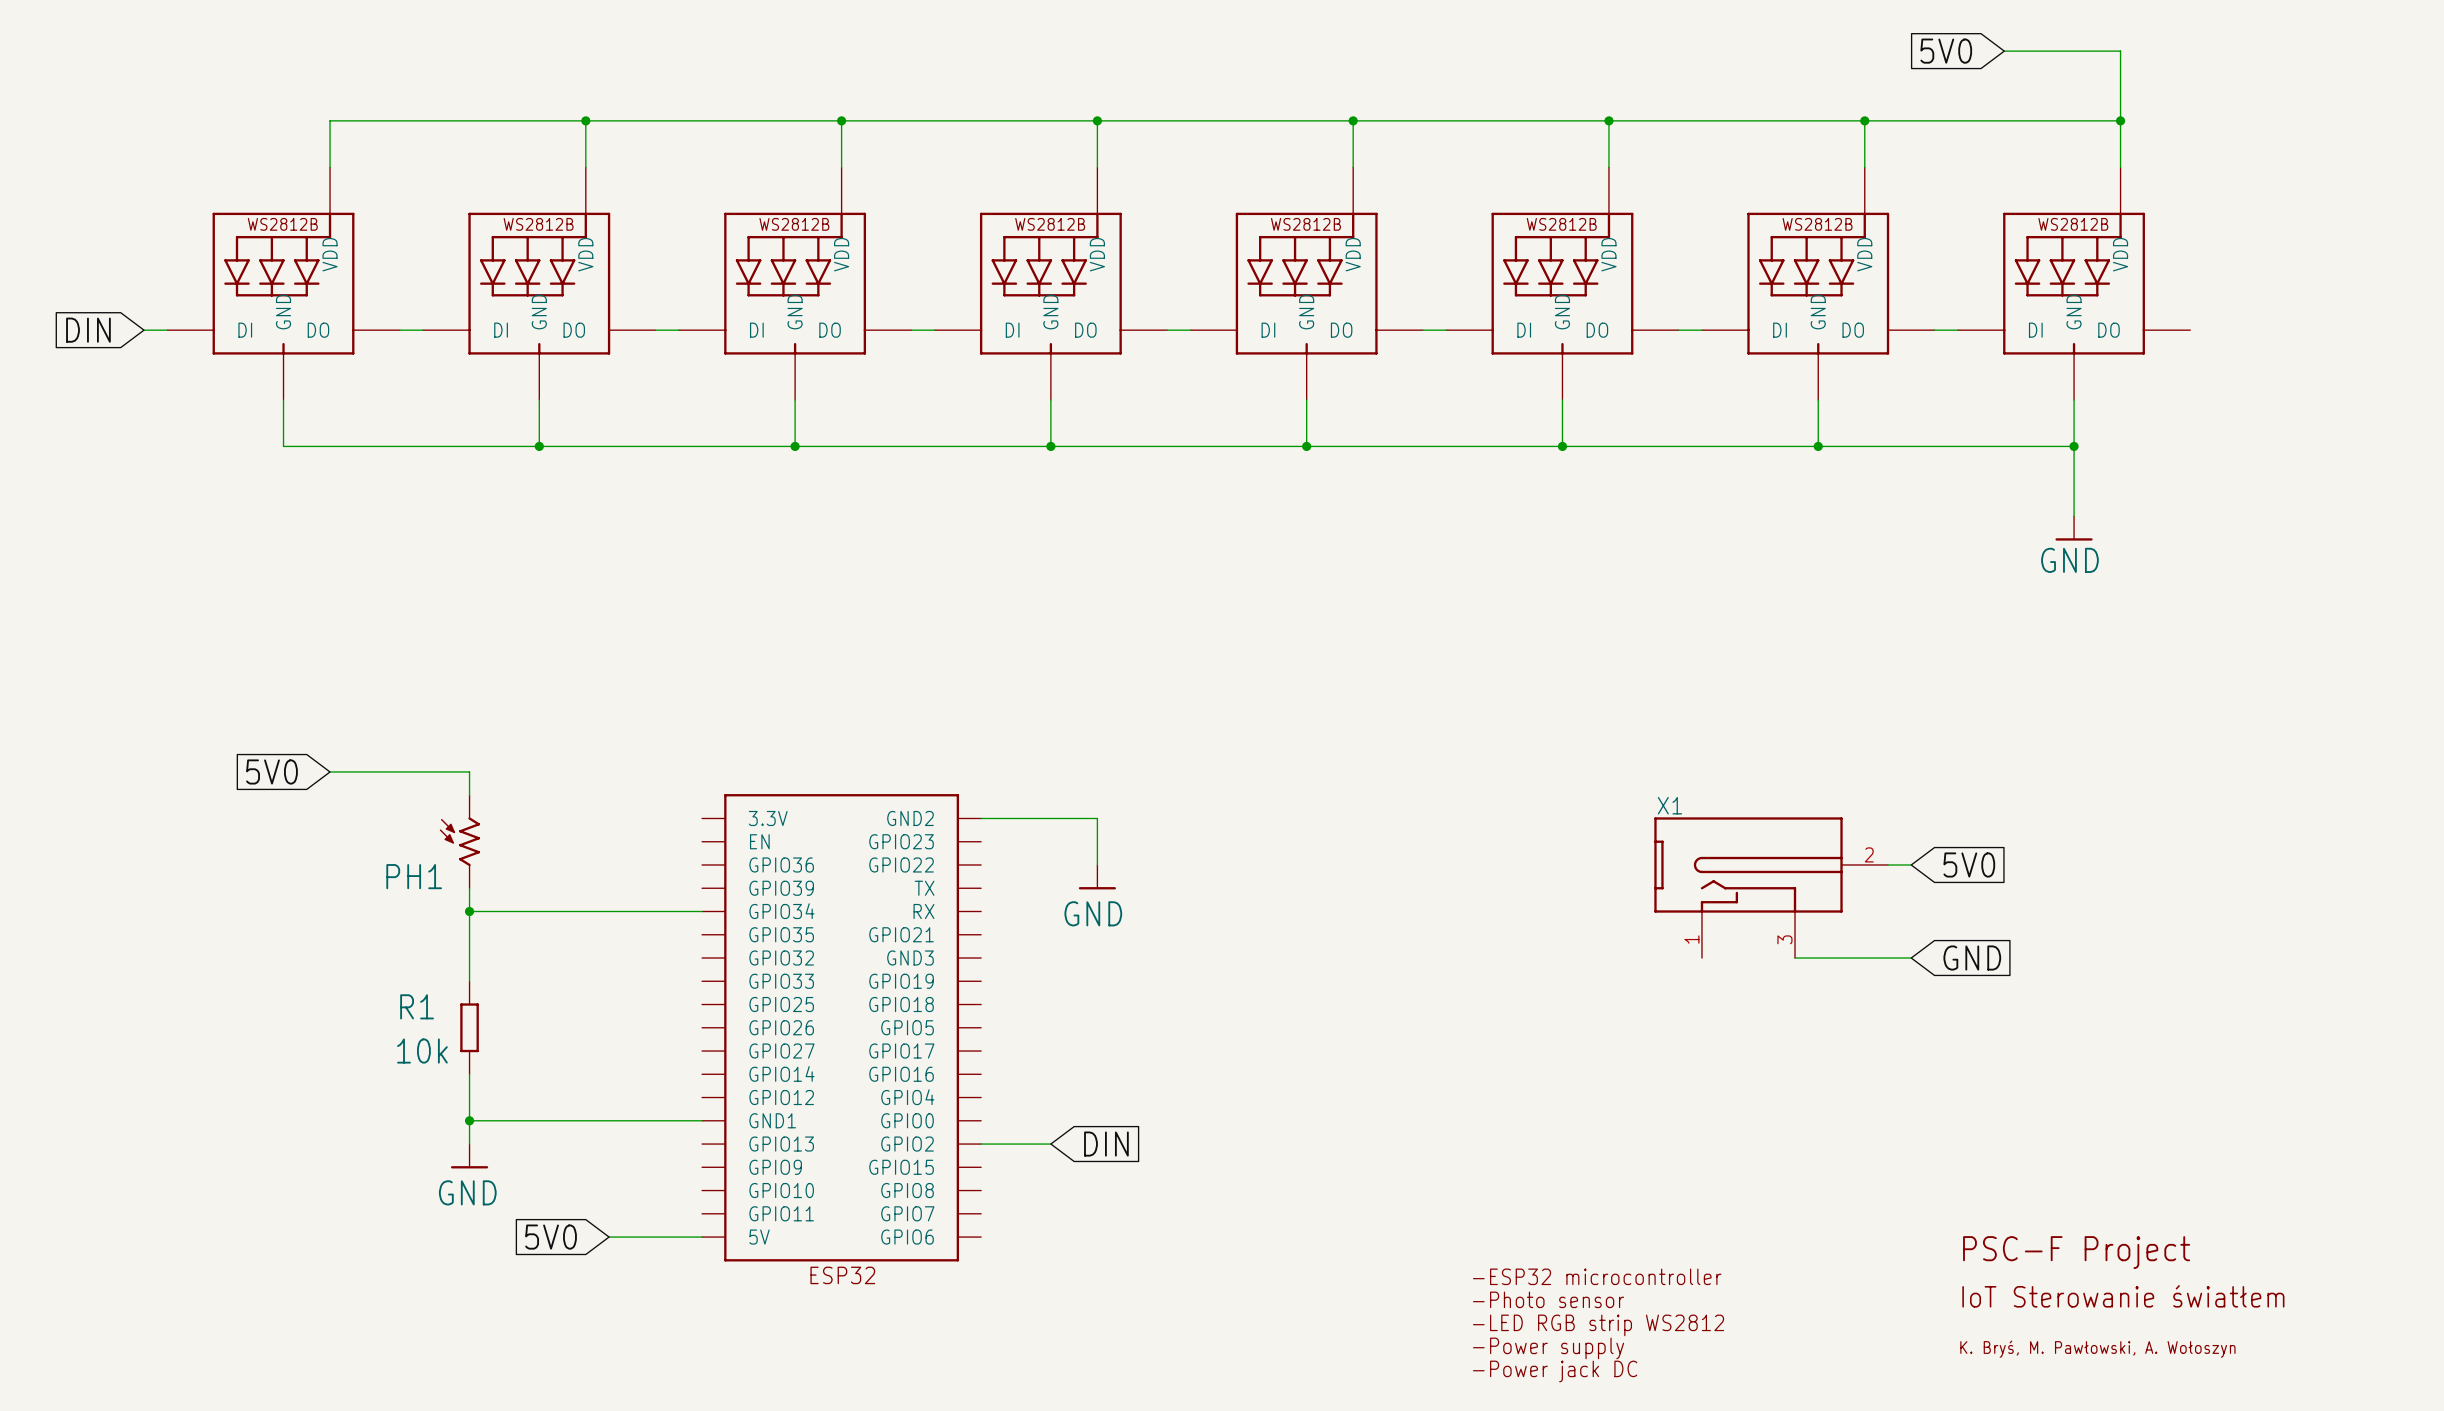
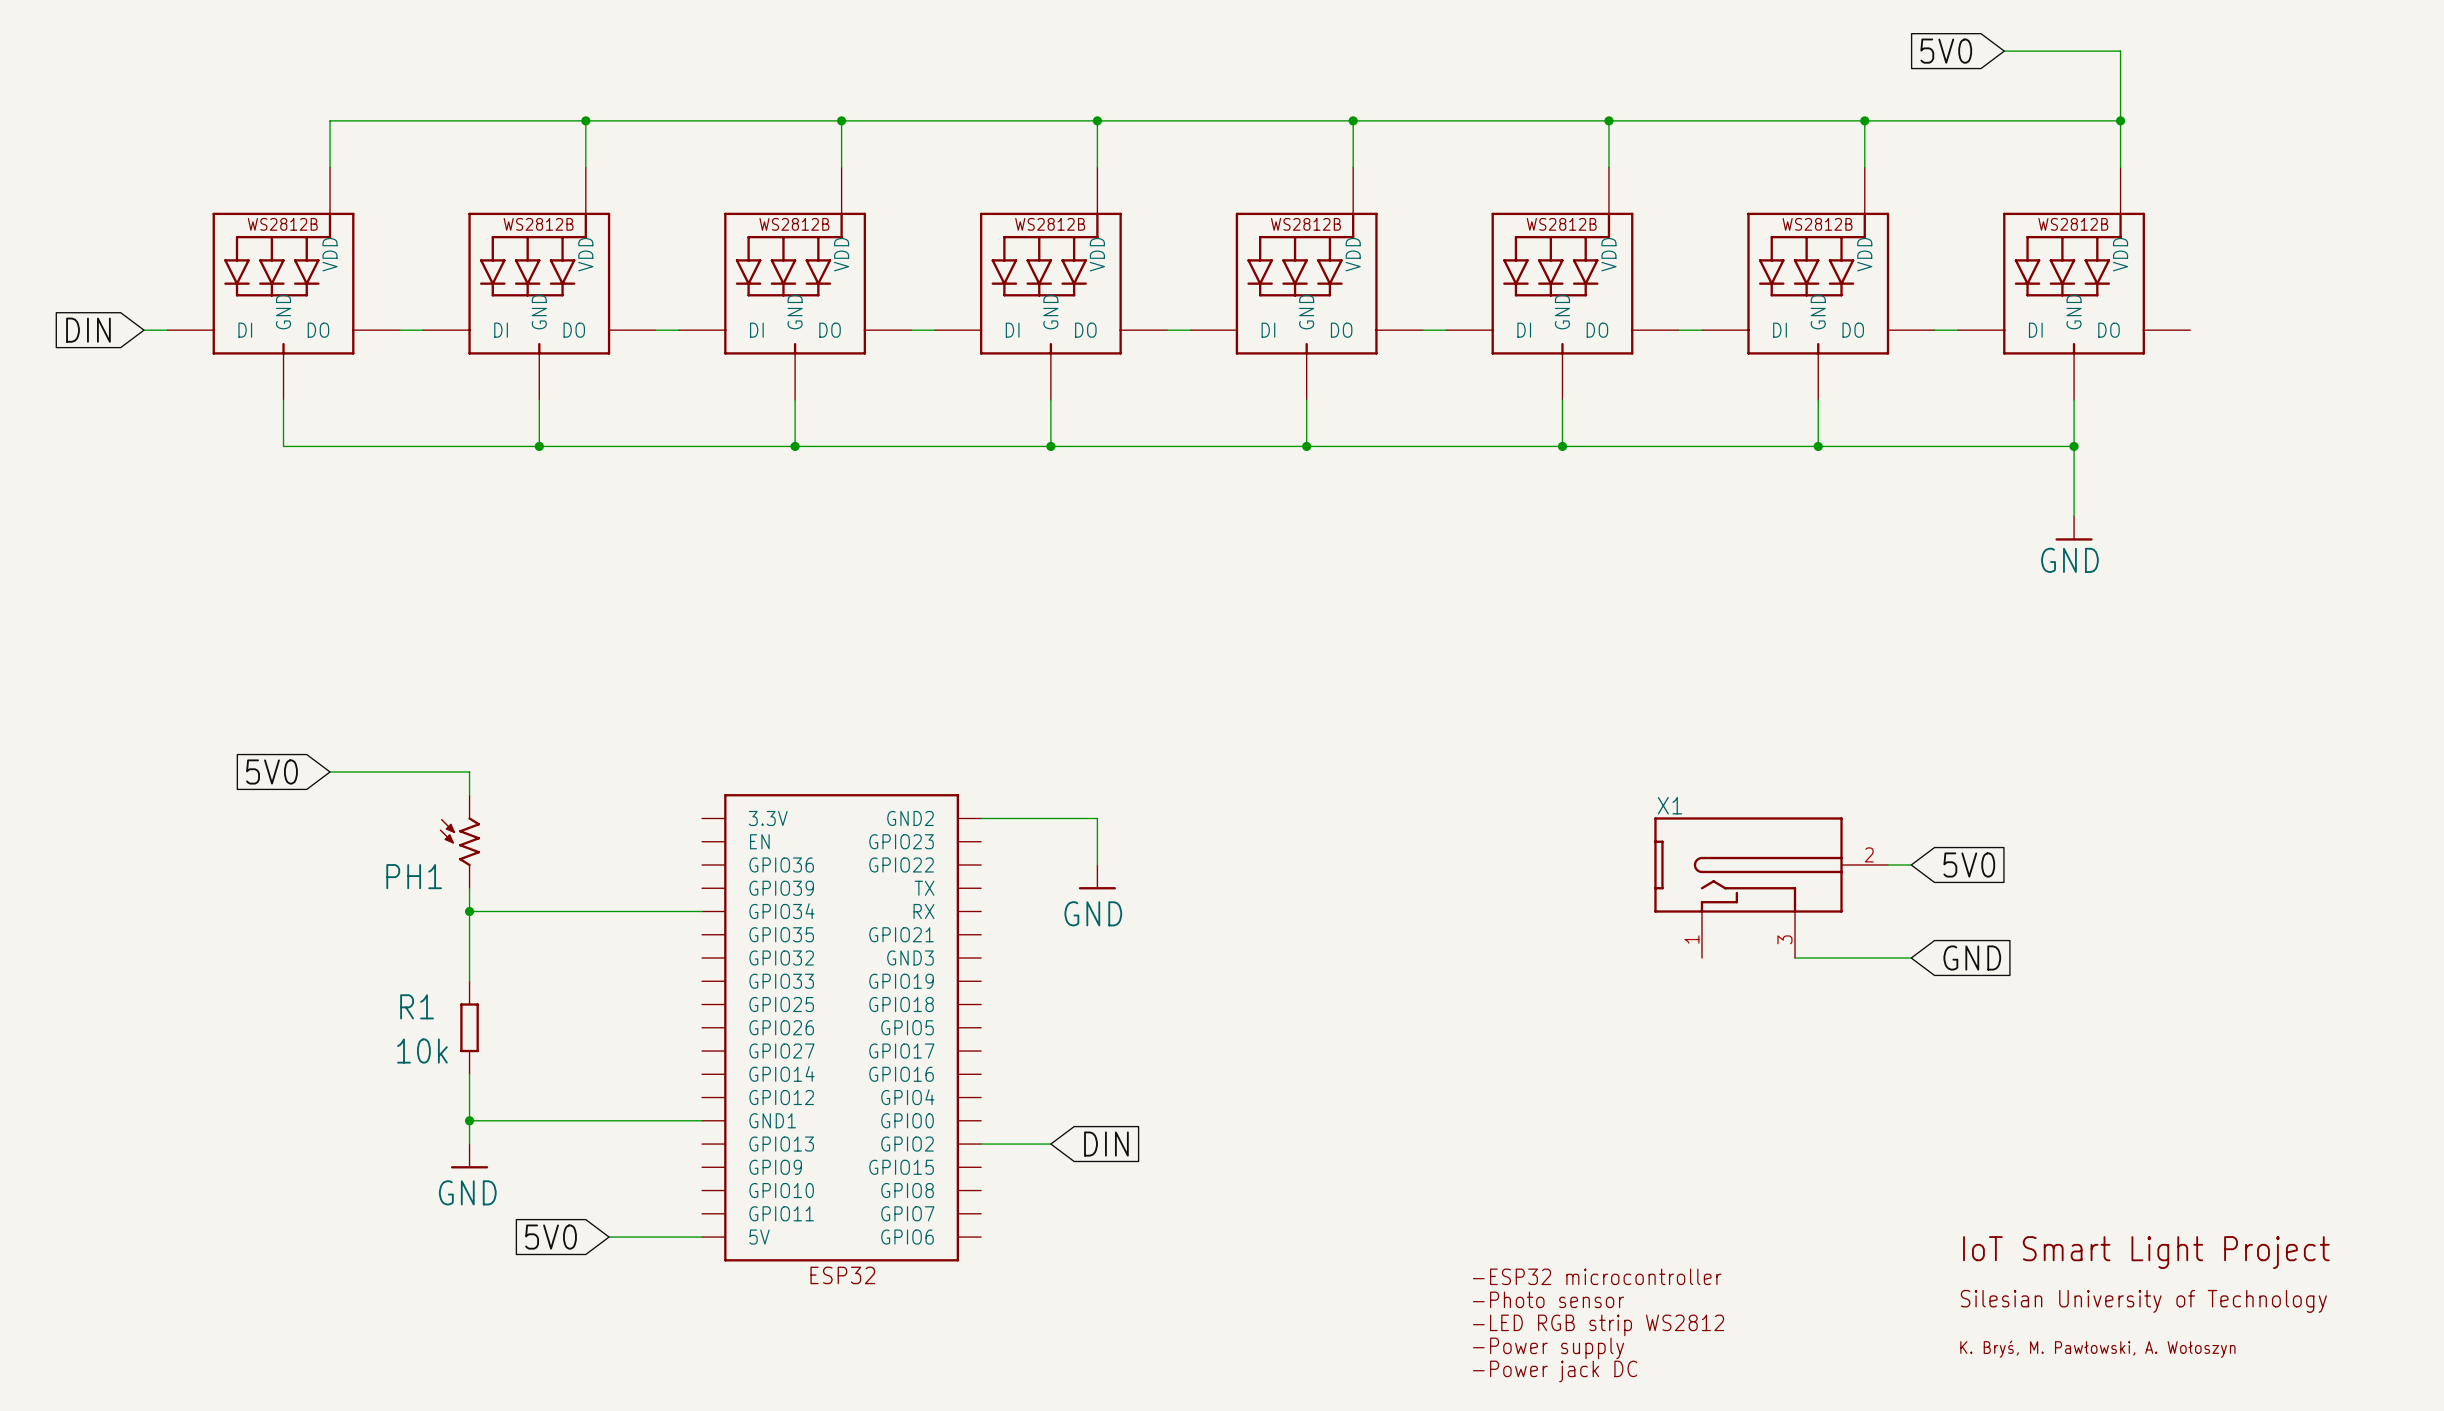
text: PSC-F Project (2076, 1252) -> IoT Smart Light Project (2146, 1252)
text: IoT Sterowanie światłem (2123, 1296) -> Silesian University of Technology (2143, 1301)

